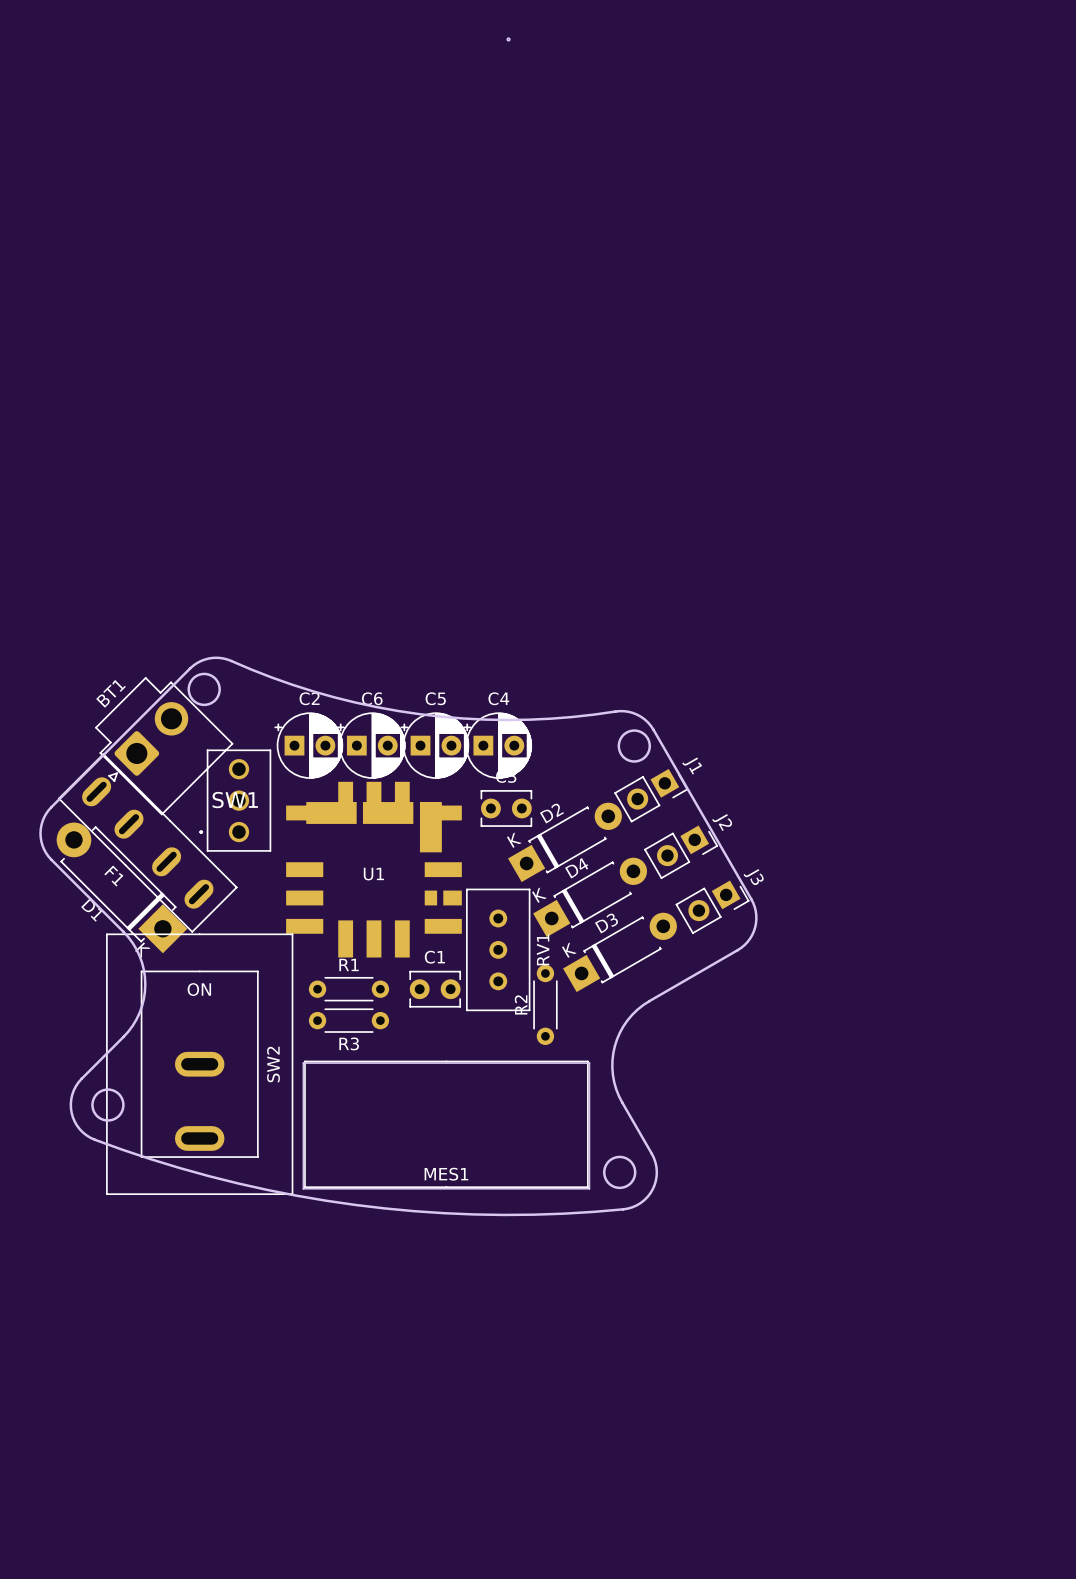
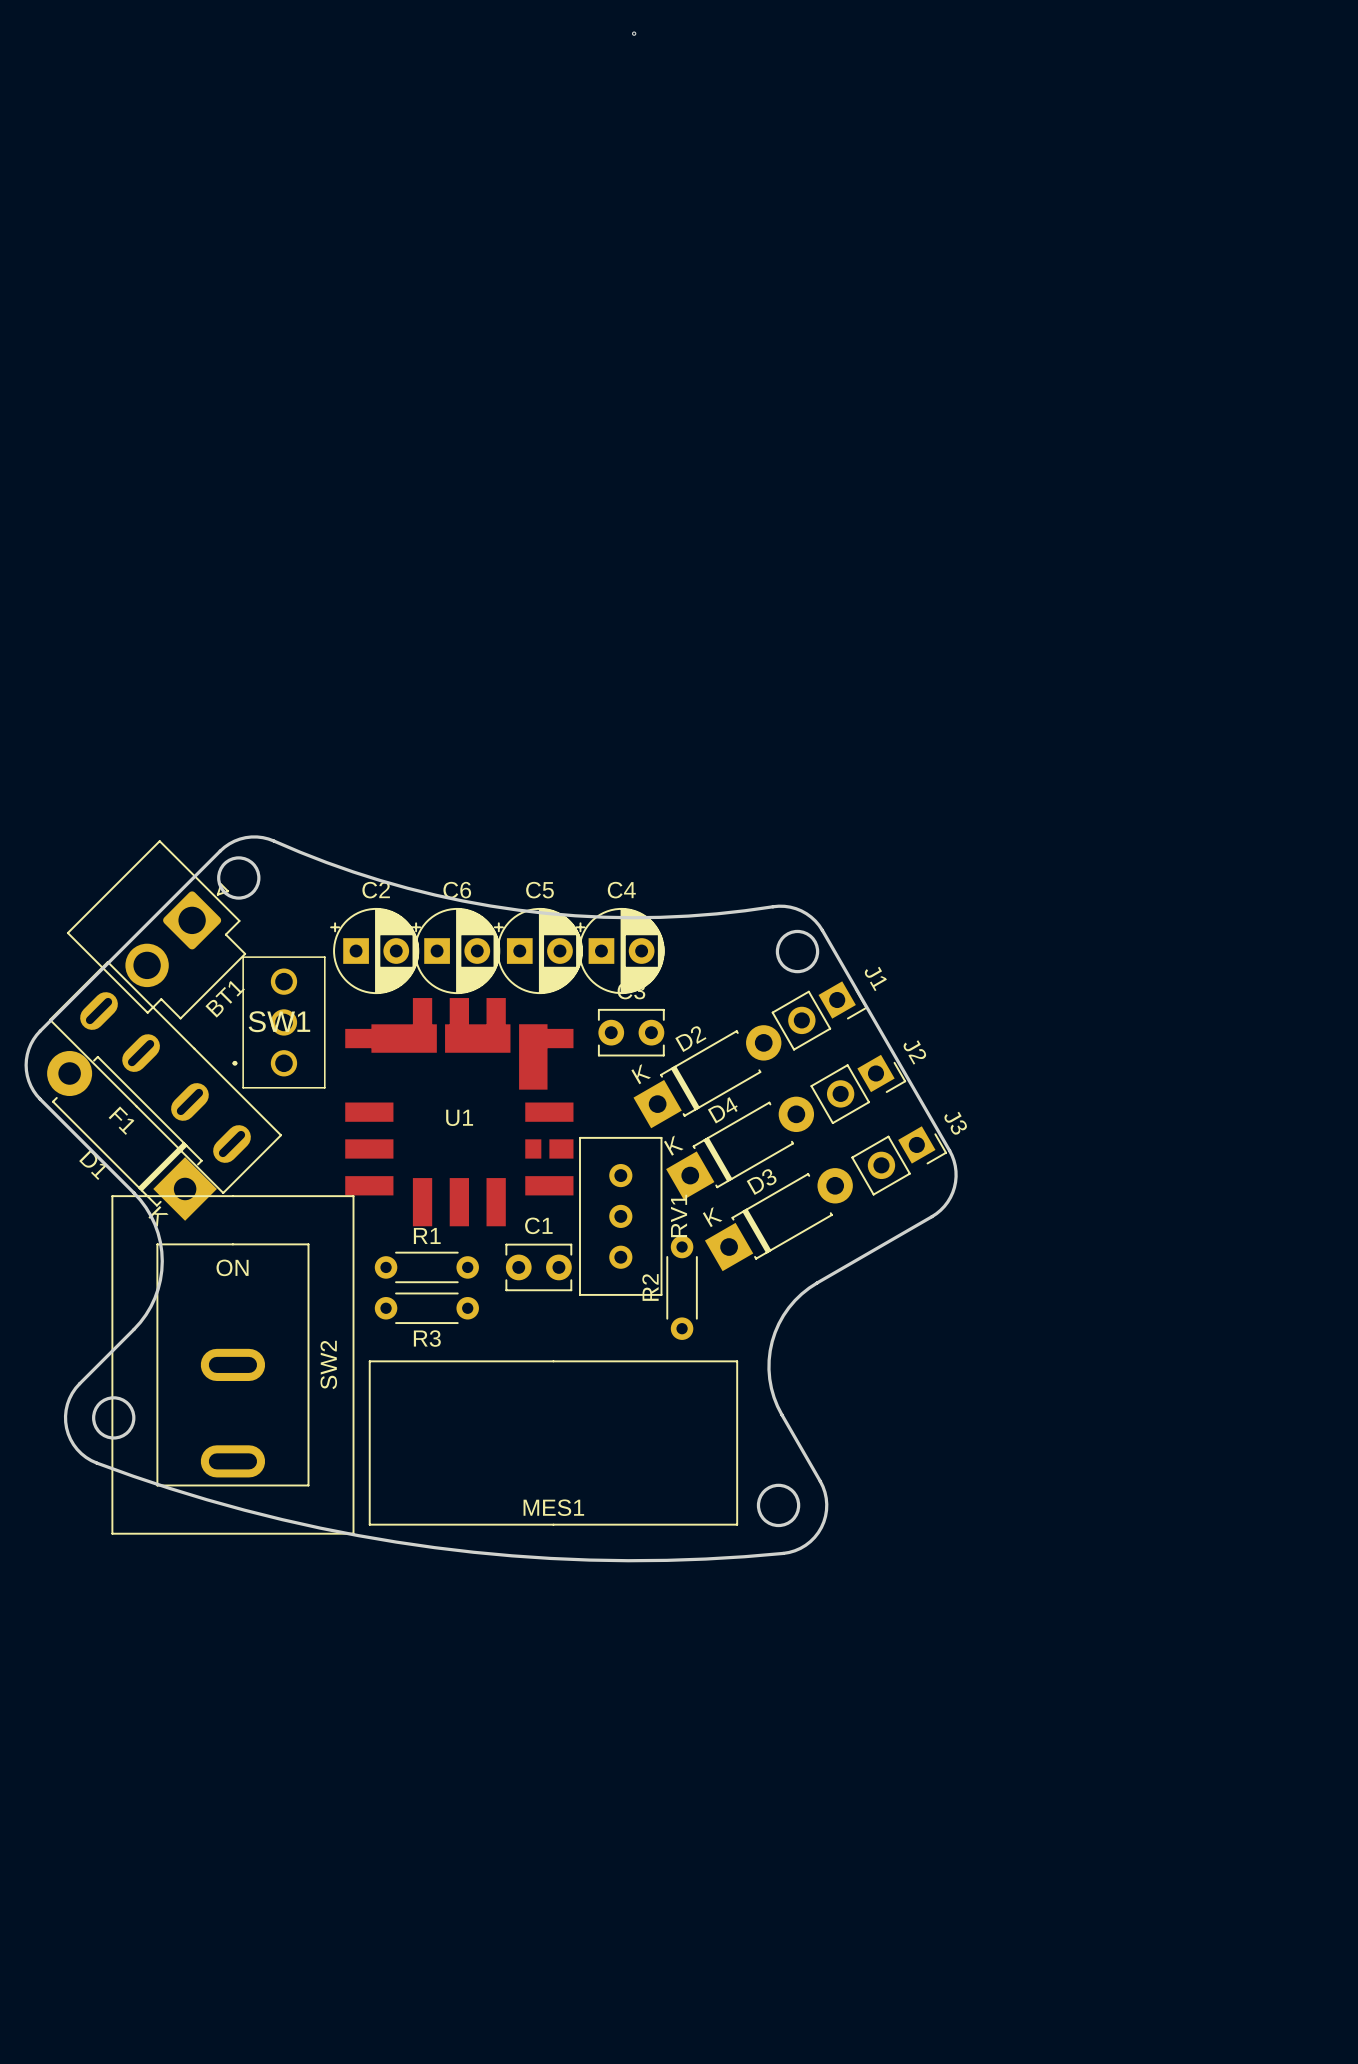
BT1 rotation: 0° (164, 746) -> 180° (156, 929)
board edge: (303, 1063) (589, 1063) (589, 1188) (303, 1188) (303, 1063) -> none

